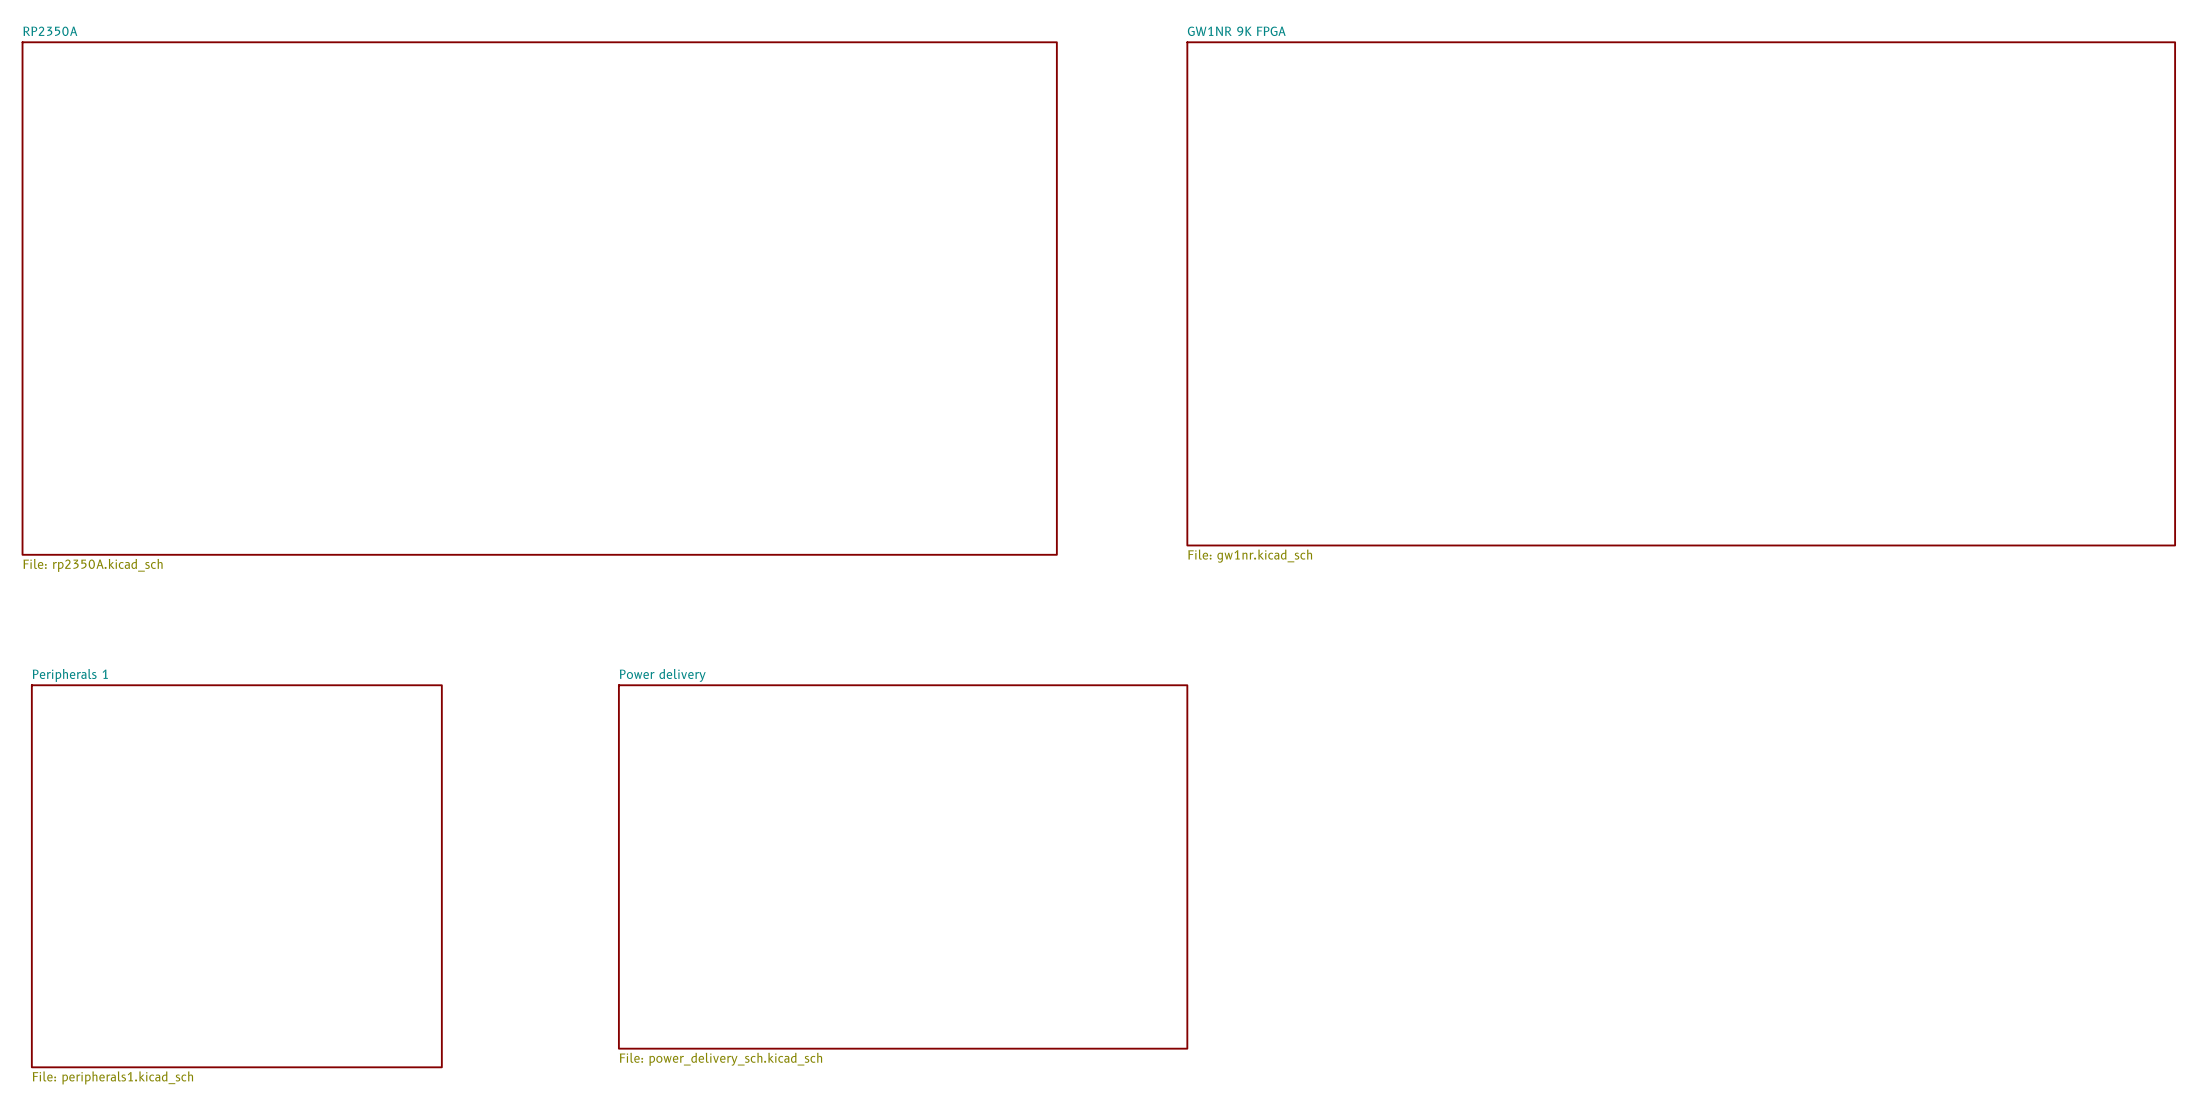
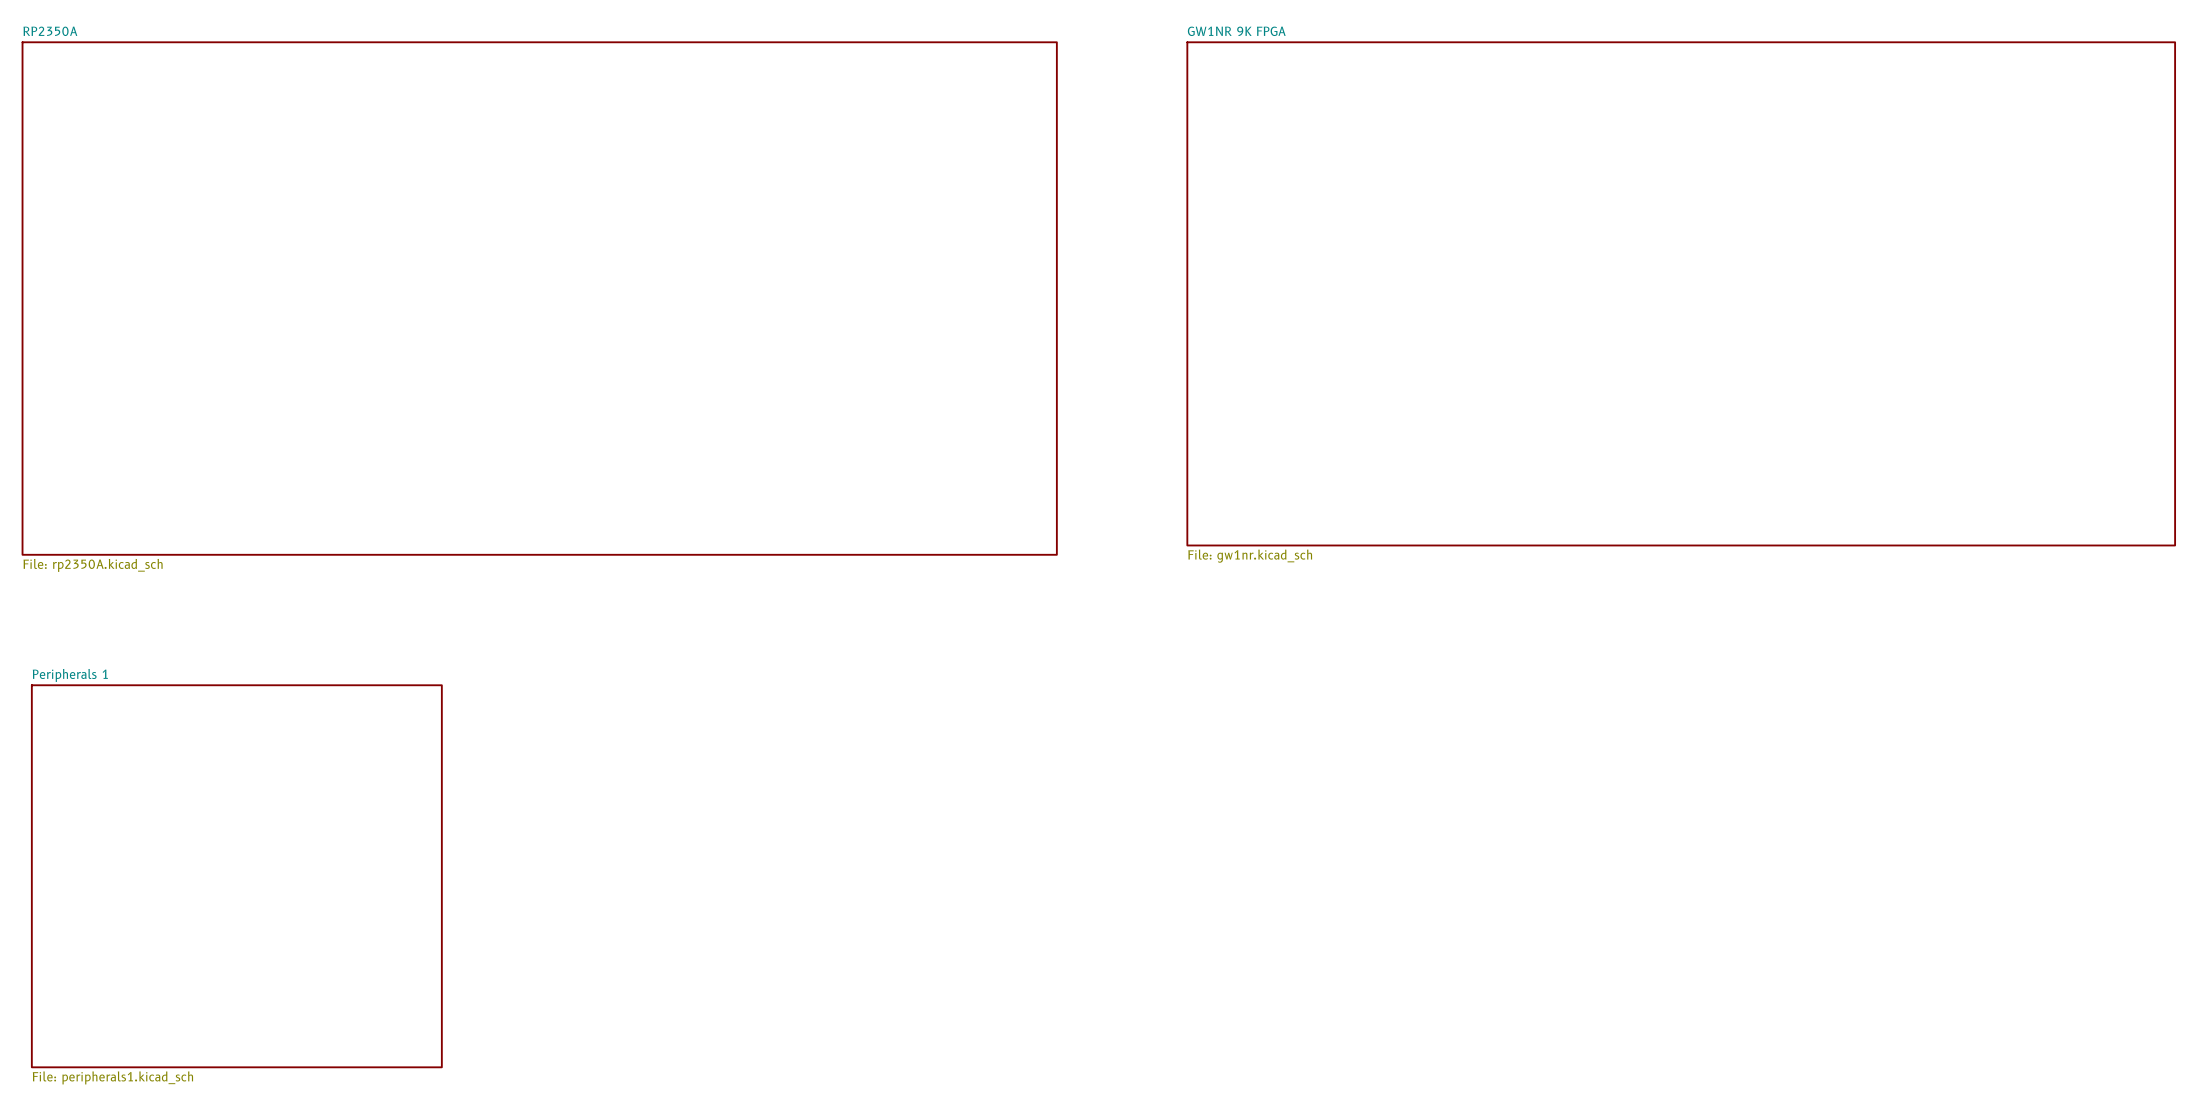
sheet Power delivery: File: power_delivery_sch.kicad_sch (903, 866) -> none

